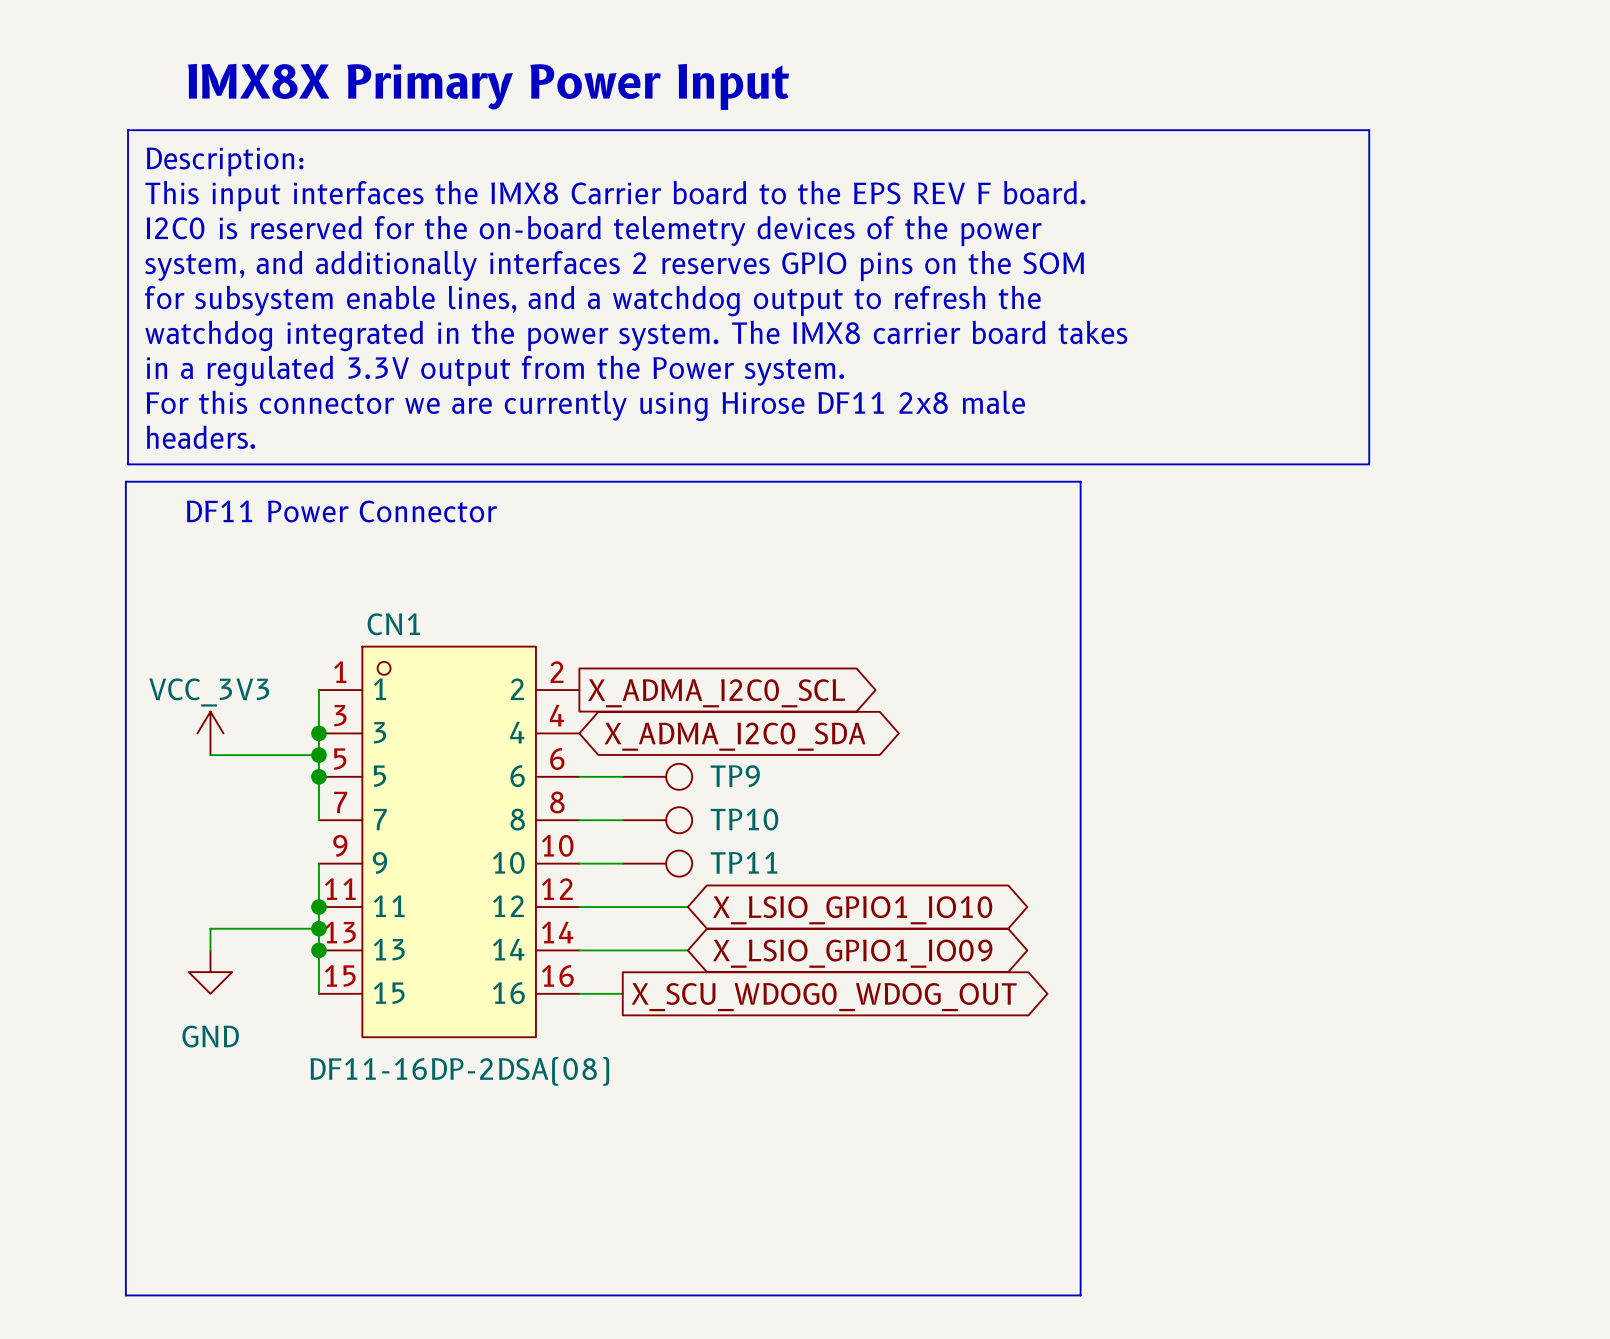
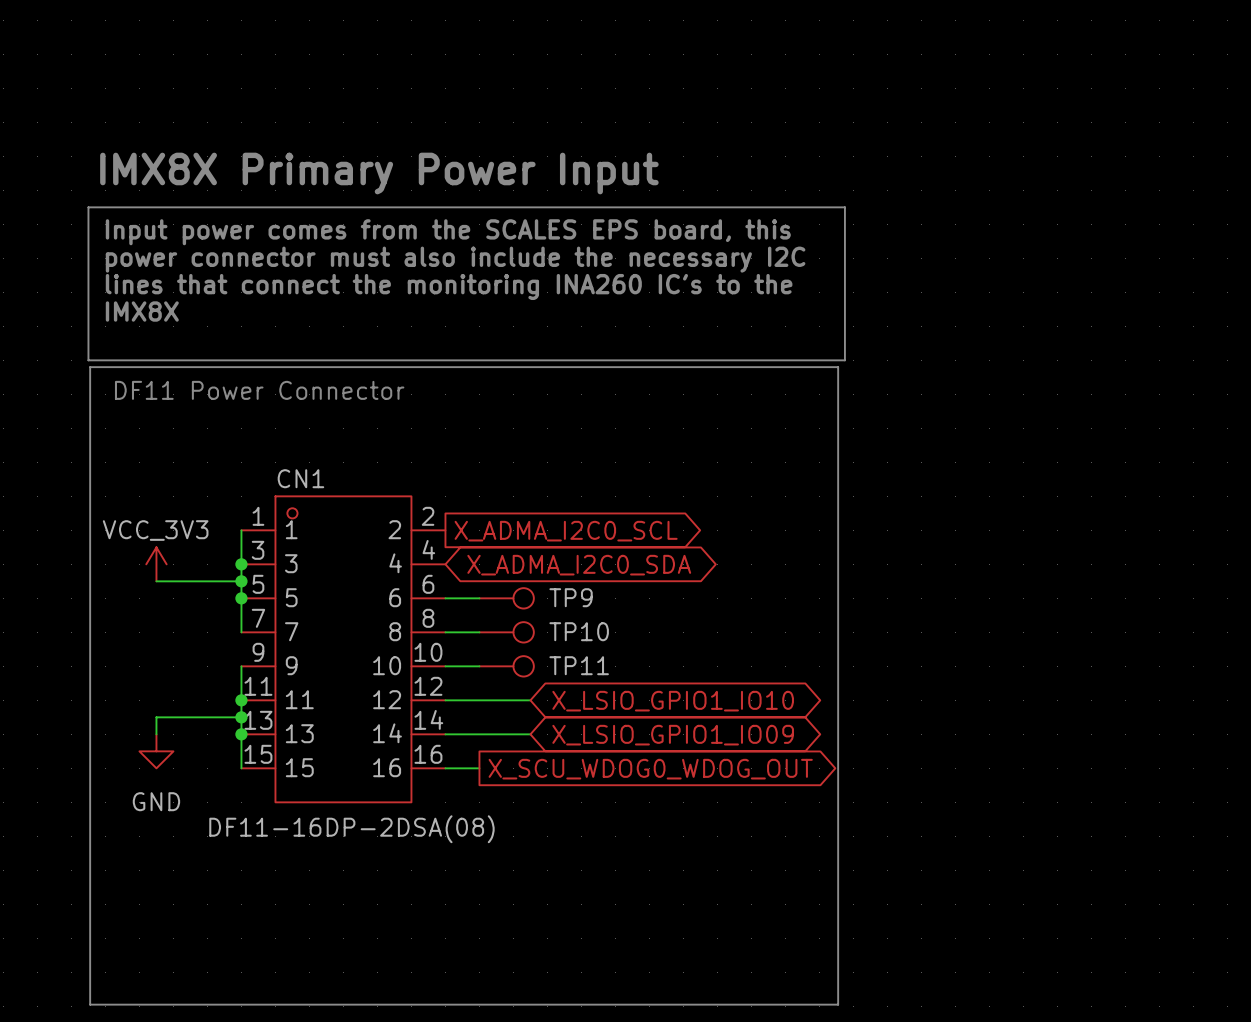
text position: IMX8X Primary Power Input (488, 86) -> IMX8X Primary Power Input (379, 173)
line: (128, 130) (1369, 130) (1369, 464) (128, 464) (128, 130) -> none
text: Description: (225, 161) -> none
text: This input interfaces the IMX8 Carrier board to the EPS REV F board. (615, 196) -> none
text: I2C0 is reserved for the on-board telemetry devices of the power (594, 231) -> none
text: system, and additionally interfaces 2 reserves GPIO pins on the SOM (614, 266) -> none
line: none -> (88, 207) (844, 207) (844, 360) (88, 360) (88, 207)
text: for subsystem enable lines, and a watchdog output to refresh the (592, 301) -> Input power comes from the SCALES EPS board, this (448, 232)
text: watchdog integrated in the power system. The IMX8 carrier board takes (636, 336) -> power connector must also include the necessary I2C (455, 259)
text: in a regulated 3.3V output from the Power system. (495, 370) -> lines that connect the monitoring INA260 IC's to the (449, 286)
text: For this connector we are currently using Hirose DF11 2x8 male (585, 405) -> IMX8X (142, 311)
text: headers. (201, 437) -> none

